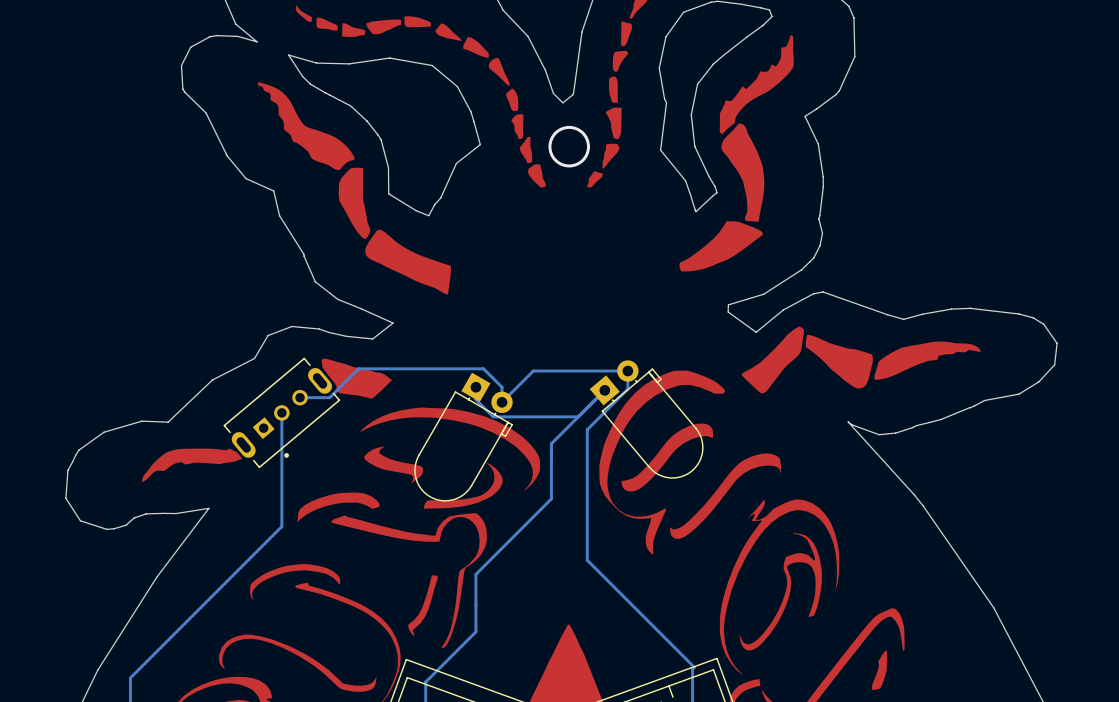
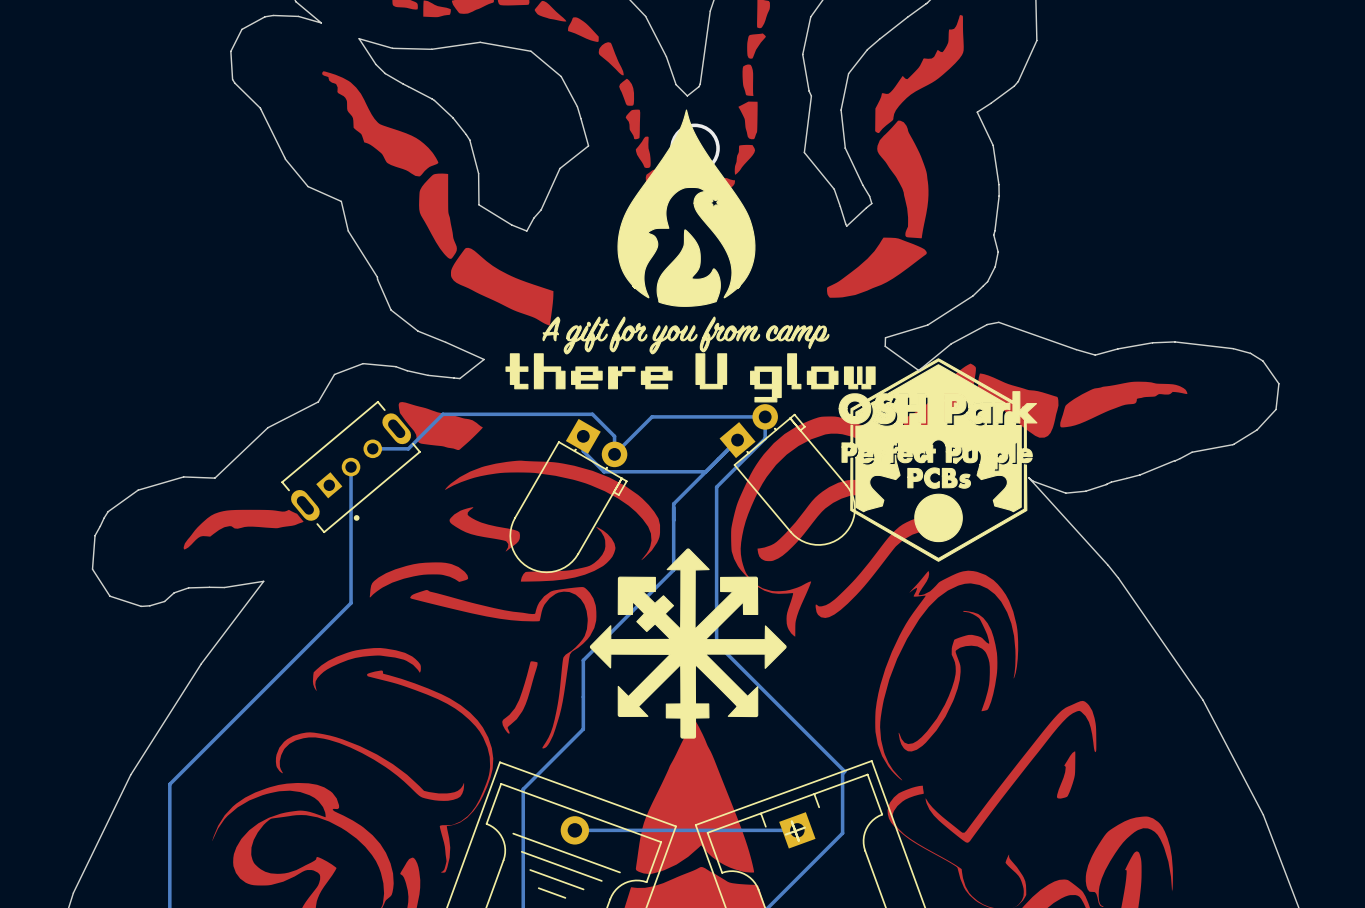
drawing: none -> [505, 109, 1038, 562]
drawing: none -> [589, 548, 787, 739]

